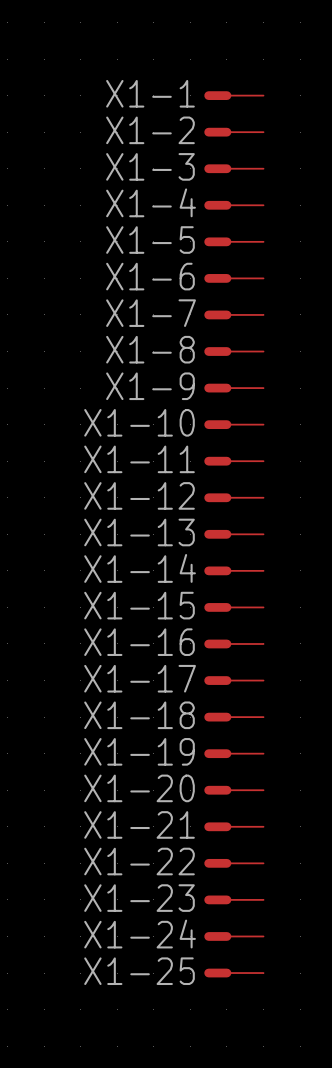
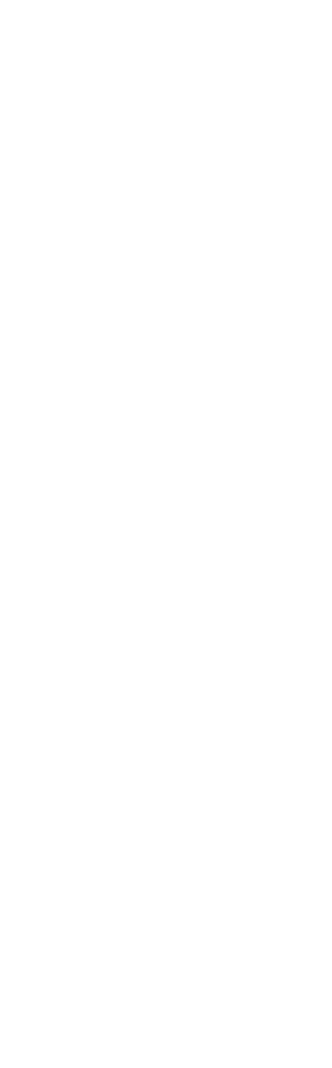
X1-1: (233, 95) -> none
X1-2: (233, 132) -> none
X1-3: (233, 168) -> none
X1-4: (233, 205) -> none
X1-5: (233, 241) -> none
X1-6: (233, 278) -> none
X1-7: (233, 314) -> none
X1-8: (233, 351) -> none
X1-9: (233, 388) -> none
X1-10: (233, 424) -> none
X1-11: (233, 461) -> none
X1-12: (233, 497) -> none
X1-13: (233, 534) -> none
X1-14: (233, 570) -> none
X1-15: (233, 607) -> none
X1-16: (233, 643) -> none
X1-17: (233, 680) -> none
X1-18: (233, 717) -> none
X1-19: (233, 753) -> none
X1-20: (233, 790) -> none
X1-21: (233, 826) -> none
X1-22: (233, 863) -> none
X1-23: (233, 899) -> none
X1-24: (233, 936) -> none
X1-25: (233, 973) -> none

